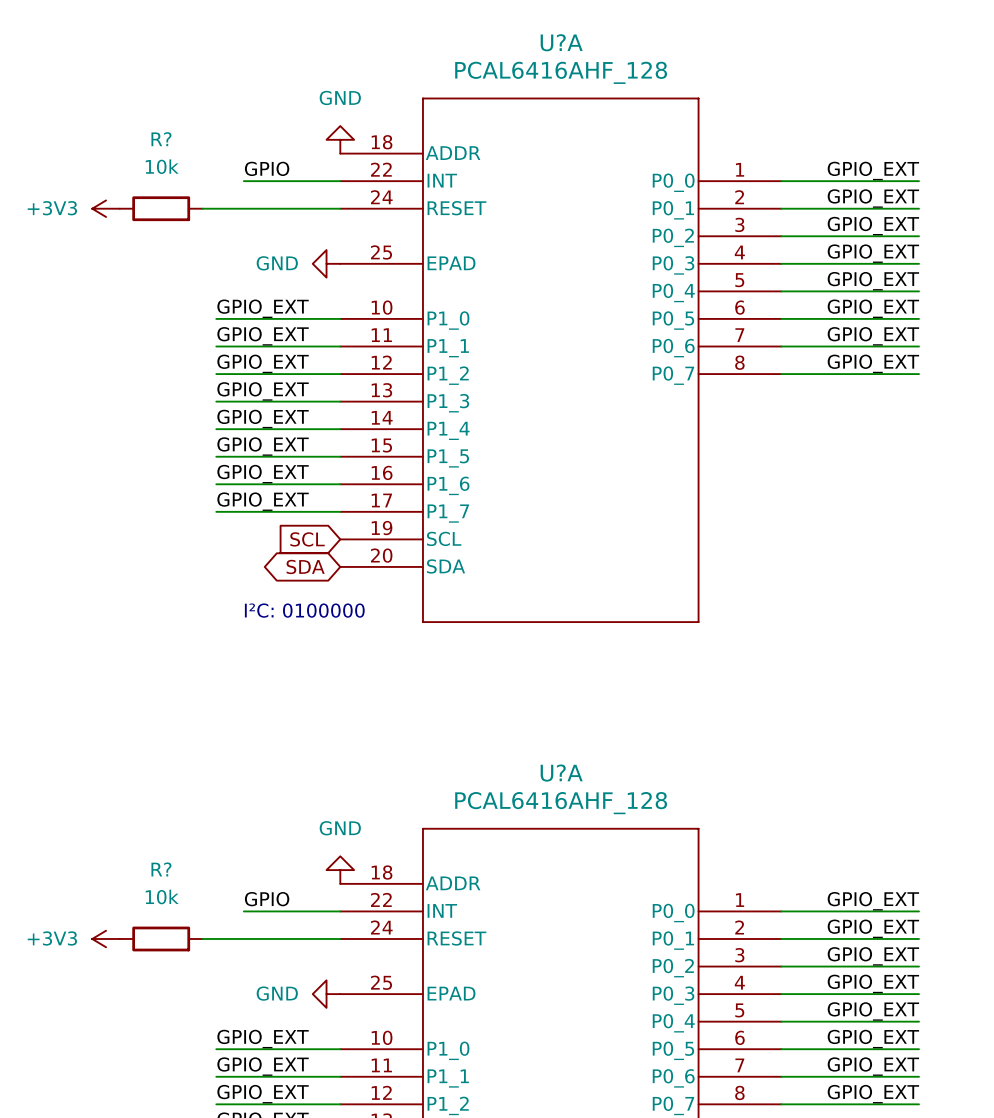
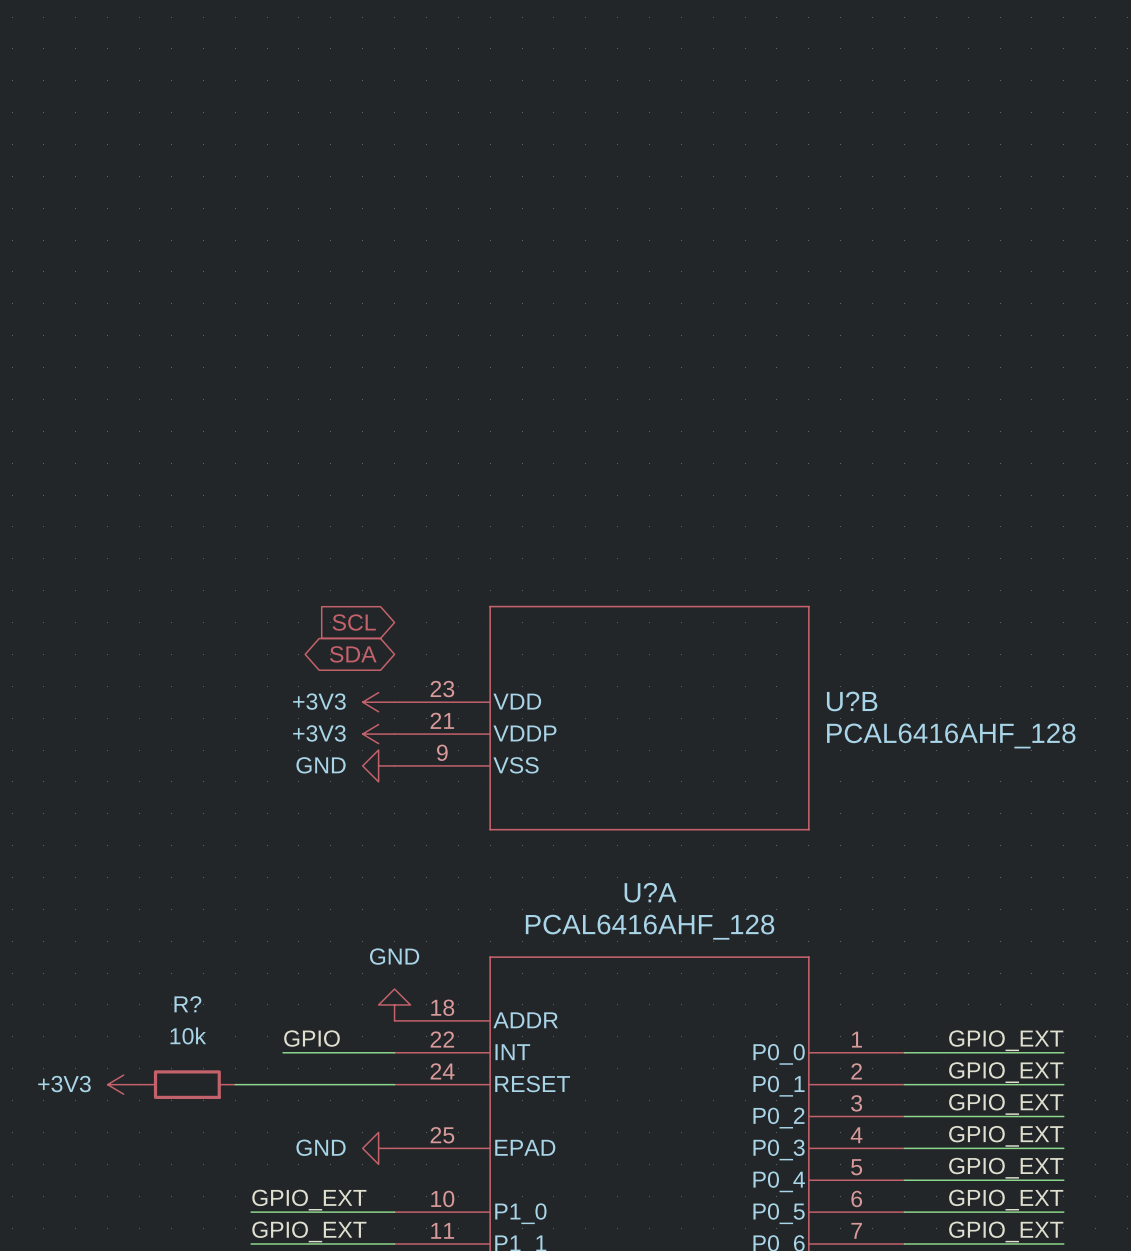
power symbol: GND (340, 139) -> none
label: GPIO (267, 168) -> none
label: GPIO_EXT (873, 170) -> none
wire: (243, 181) (340, 181) -> none
wire: (781, 181) (919, 181) -> none
label: GPIO_EXT (873, 198) -> none
power symbol: +3V3 (106, 208) -> none
R?: 10k (161, 208) -> none
wire: (202, 208) (340, 208) -> none
wire: (781, 208) (919, 208) -> none
label: GPIO_EXT (873, 226) -> none
wire: (781, 236) (919, 236) -> none
label: GPIO_EXT (873, 253) -> none
power symbol: GND (326, 263) -> none
wire: (781, 263) (919, 263) -> none
label: GPIO_EXT (873, 281) -> none
wire: (781, 291) (919, 291) -> none
label: GPIO_EXT (263, 308) -> none
label: GPIO_EXT (873, 308) -> none
wire: (216, 318) (340, 318) -> none
wire: (781, 318) (919, 318) -> none
label: GPIO_EXT (263, 336) -> none
label: GPIO_EXT (873, 336) -> none
wire: (216, 346) (340, 346) -> none
wire: (781, 346) (919, 346) -> none
U?A: PCAL6416AHF_128 (560, 360) -> none
label: GPIO_EXT (263, 363) -> none
label: GPIO_EXT (873, 363) -> none
wire: (216, 374) (340, 374) -> none
wire: (781, 374) (919, 374) -> none
label: GPIO_EXT (263, 391) -> none
wire: (216, 401) (340, 401) -> none
label: GPIO_EXT (263, 418) -> none
wire: (216, 429) (340, 429) -> none
label: GPIO_EXT (263, 446) -> none
wire: (216, 456) (340, 456) -> none
label: GPIO_EXT (263, 474) -> none
wire: (216, 484) (340, 484) -> none
label: GPIO_EXT (263, 501) -> none
wire: (216, 511) (340, 511) -> none
power symbol: none -> +3V3 (378, 702)
text: I²C: 0100000 (304, 610) -> none
U?B: none -> PCAL6416AHF_128 (602, 718)
power symbol: none -> +3V3 (378, 734)
power symbol: none -> GND (378, 765)

